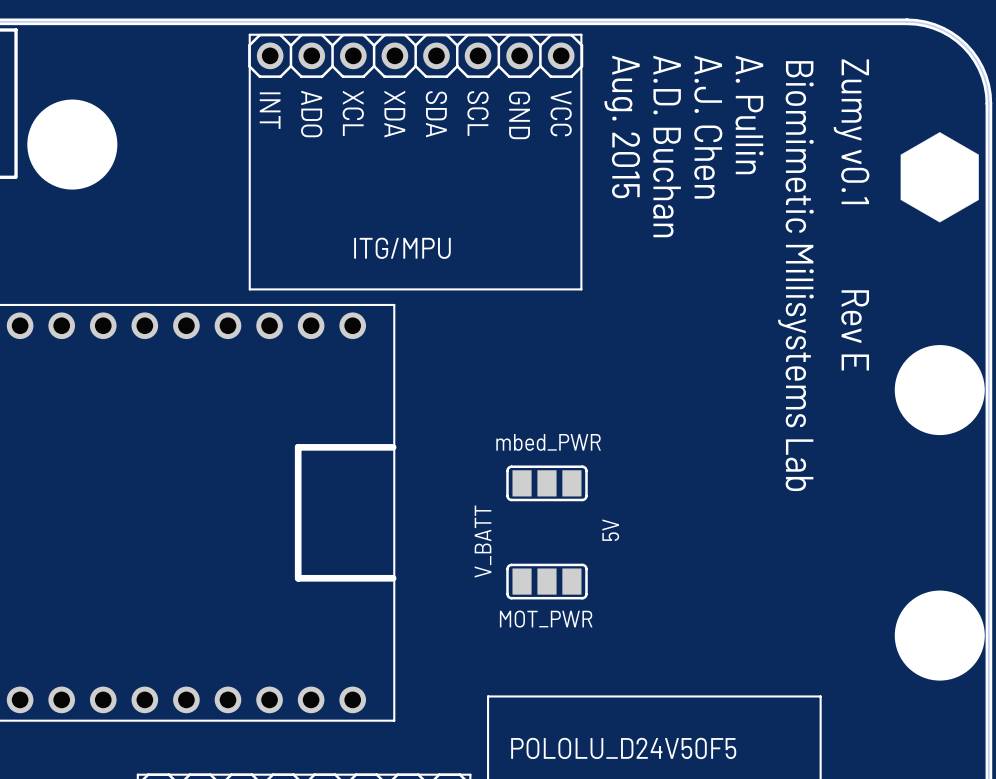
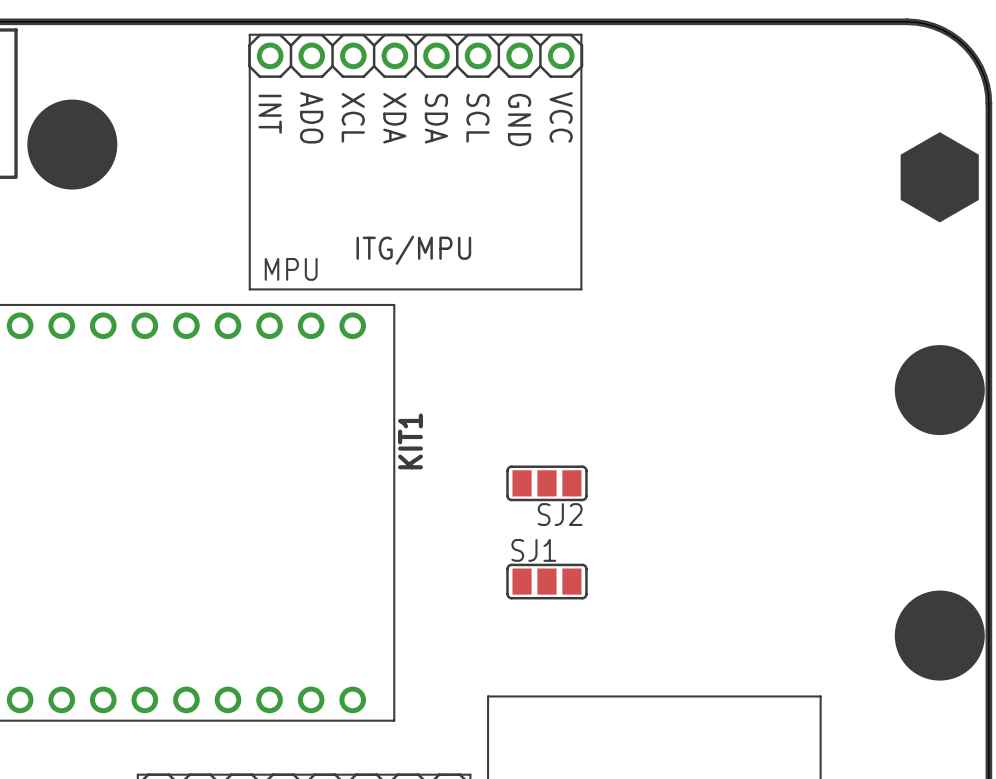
text: A. Pullin (749, 114) -> none
text: Aug. 2015 (622, 126) -> none
text: A.J. Chen (708, 127) -> none
text: Zumy v0.1 (851, 131) -> none
text: A.D. Buchan (667, 146) -> none
MPU name: none -> MPU (291, 269)
text: Biomimetic Millisystems Lab (795, 276) -> none
text: Rev E (855, 330) -> none
KIT1 name: none -> KIT1 (410, 441)
text: mbed_PWR (548, 442) -> none
line: (393, 447) (298, 447) (298, 578) (393, 578) -> none
SJ2 name: none -> SJ2 (560, 514)
text: 5V (610, 530) -> none
text: V_BATT (483, 541) -> none
SJ1 name: none -> SJ1 (533, 550)
text: MOT_PWR (546, 619) -> none
part value: POLOLU_D24V50F5 (623, 748) -> none

